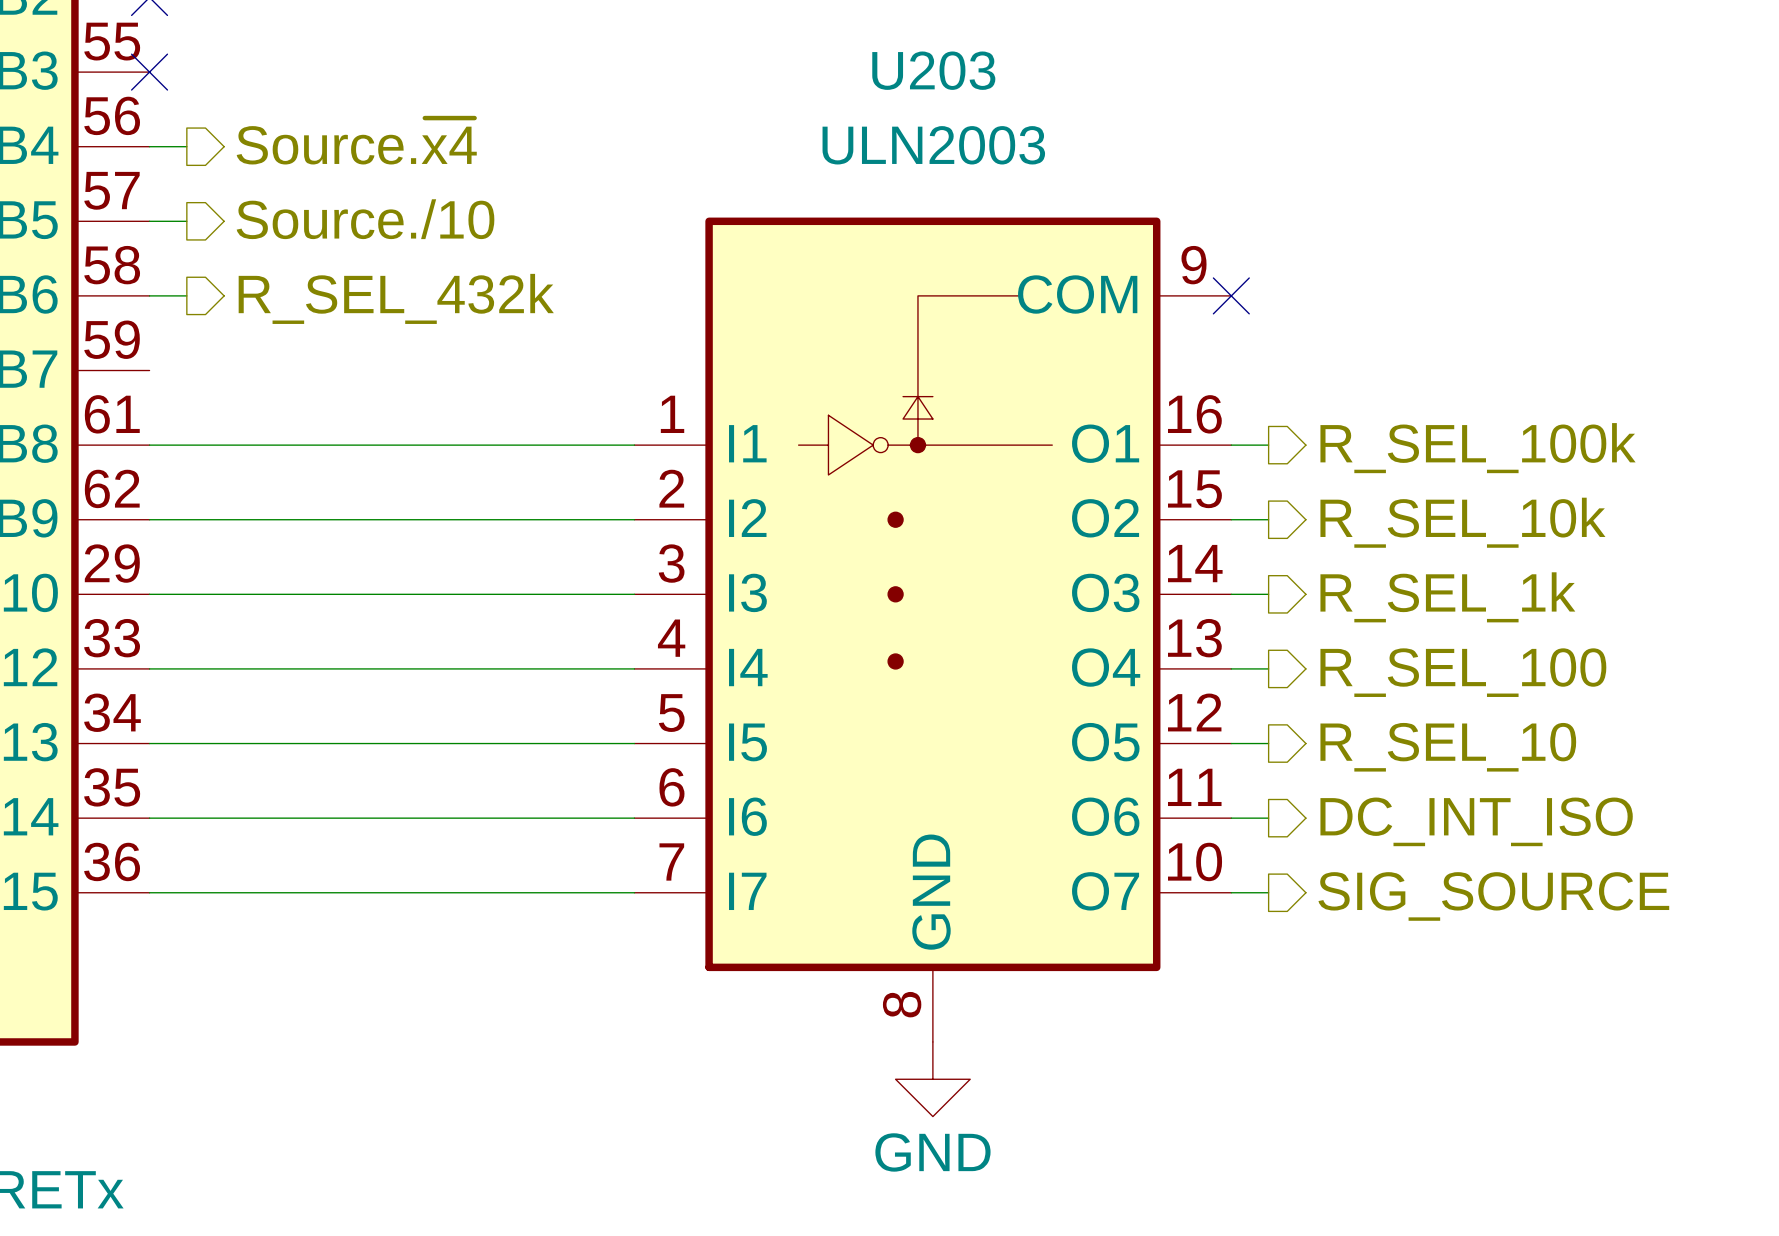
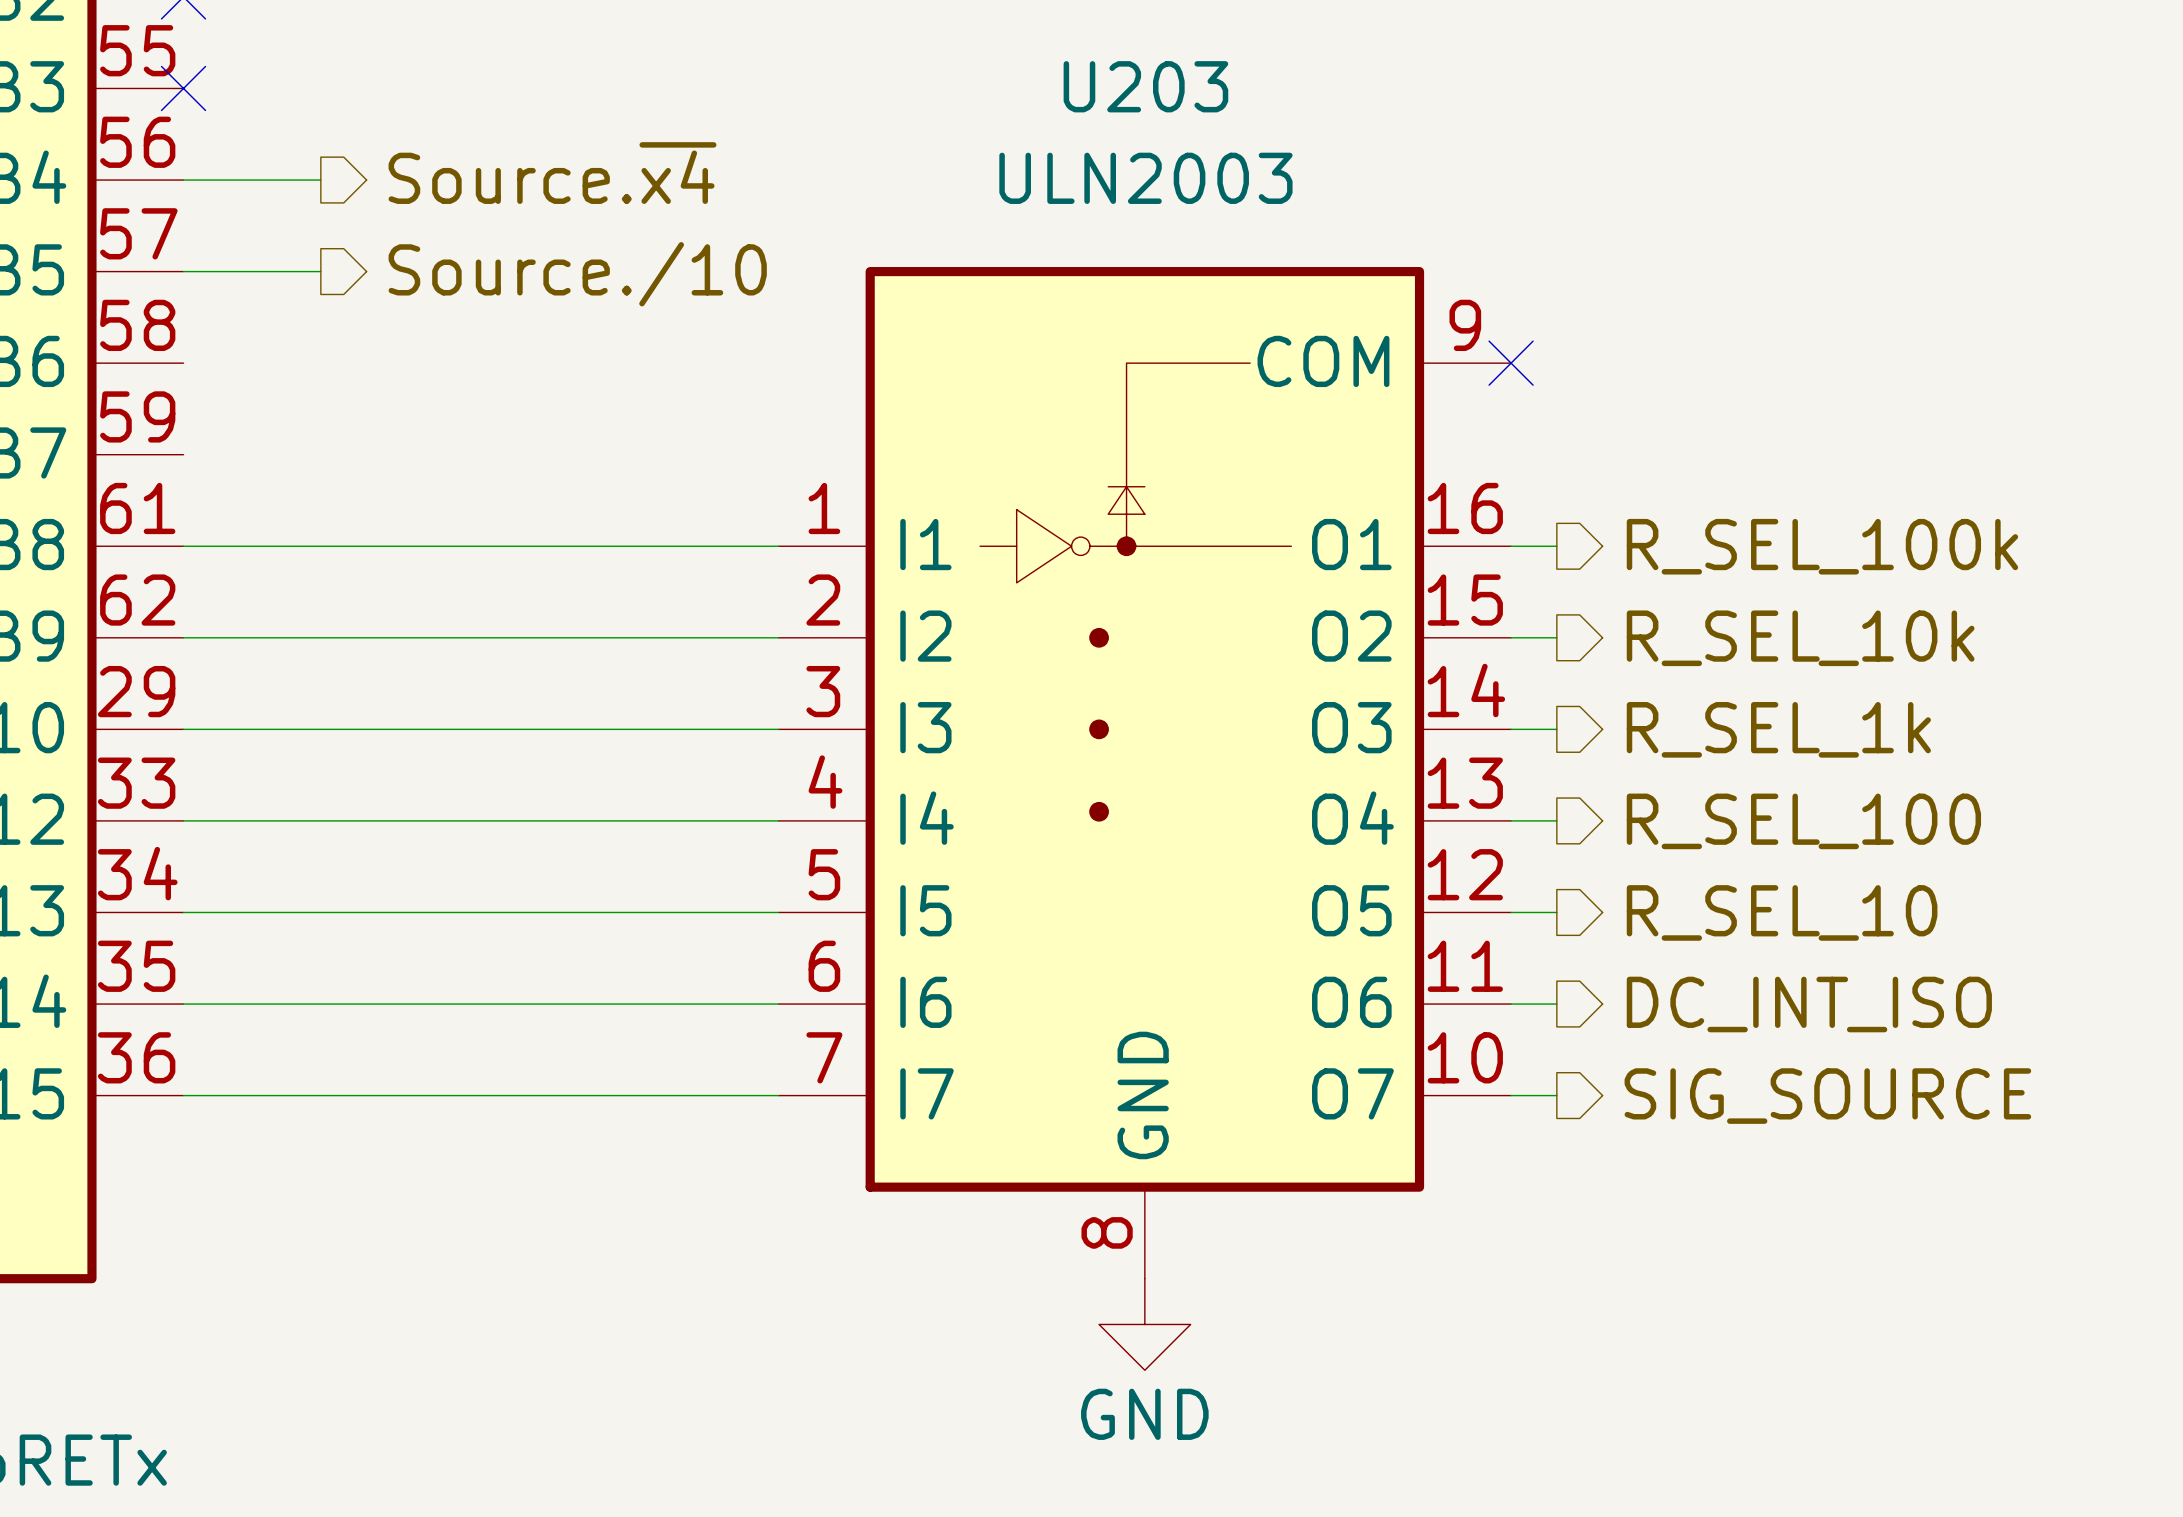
hierarchical label position: Source.~{x4} (356, 141) -> Source.~{x4} (552, 173)
wire: none -> (229, 180) (320, 180)
hierarchical label position: Source./10 (365, 219) -> Source./10 (577, 274)
wire: none -> (229, 271) (320, 271)
wire: (149, 295) (186, 295) -> none
hierarchical label: R_SEL_432k (396, 298) -> none

